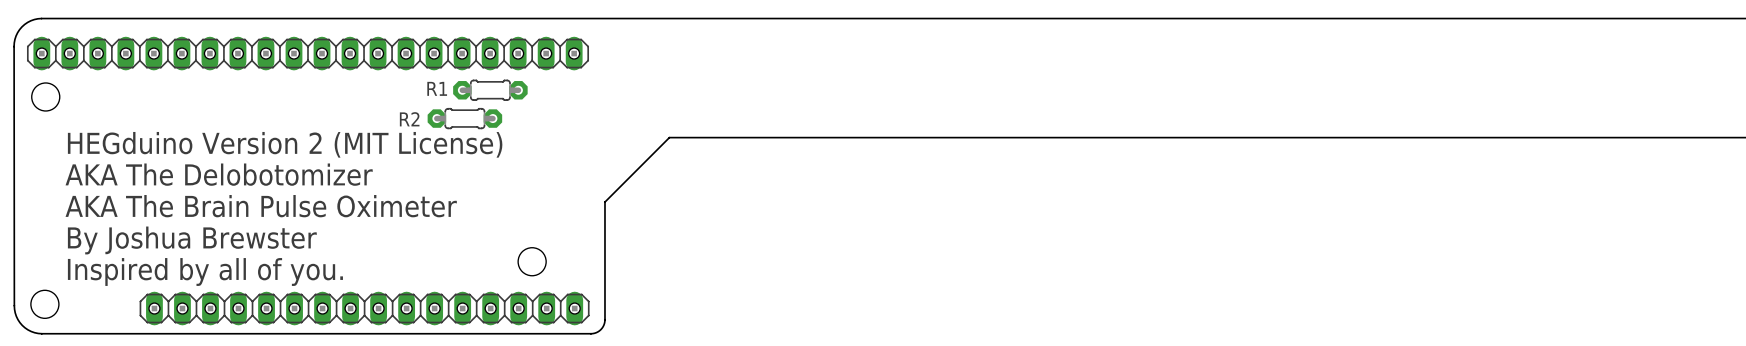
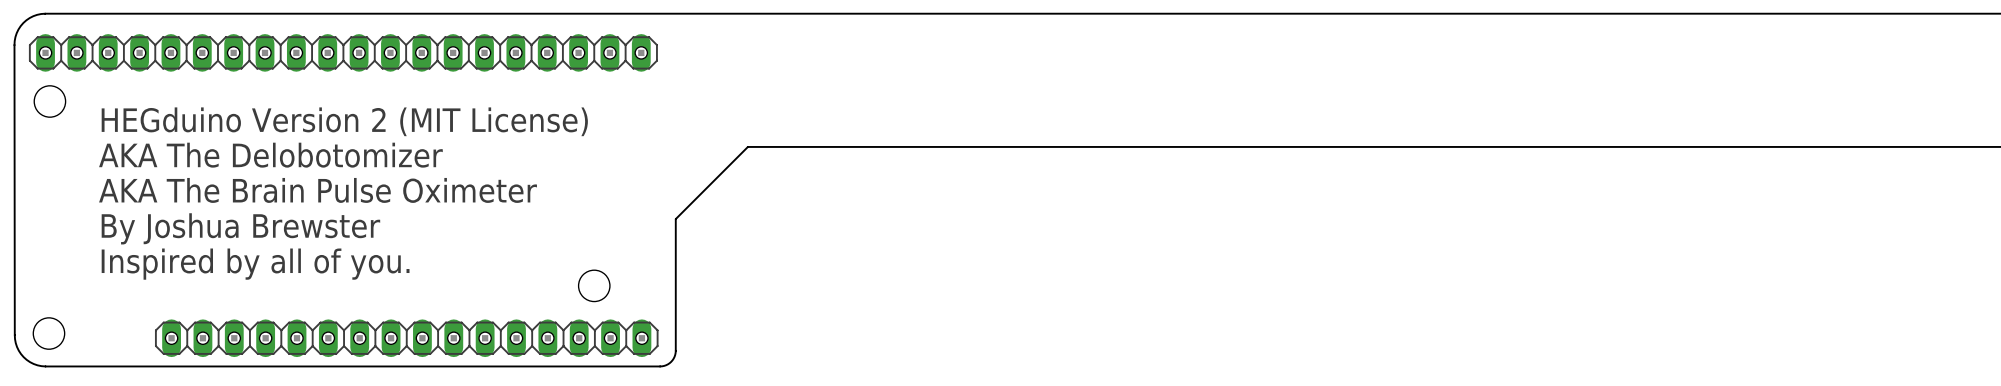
R2: (490, 90) -> none
R1: (464, 118) -> none
text position: HEGduino Version 2 (MIT License) (285, 144) -> HEGduino Version 2 (MIT License) (344, 121)
text position: AKA The Delobotomizer (219, 174) -> AKA The Delobotomizer (270, 155)
text position: AKA The Brain Pulse Oximeter (261, 206) -> AKA The Brain Pulse Oximeter (318, 190)
text position: By Joshua Brewster (192, 240) -> By Joshua Brewster (240, 228)
text position: Inspired by all of you. (205, 271) -> Inspired by all of you. (255, 264)

